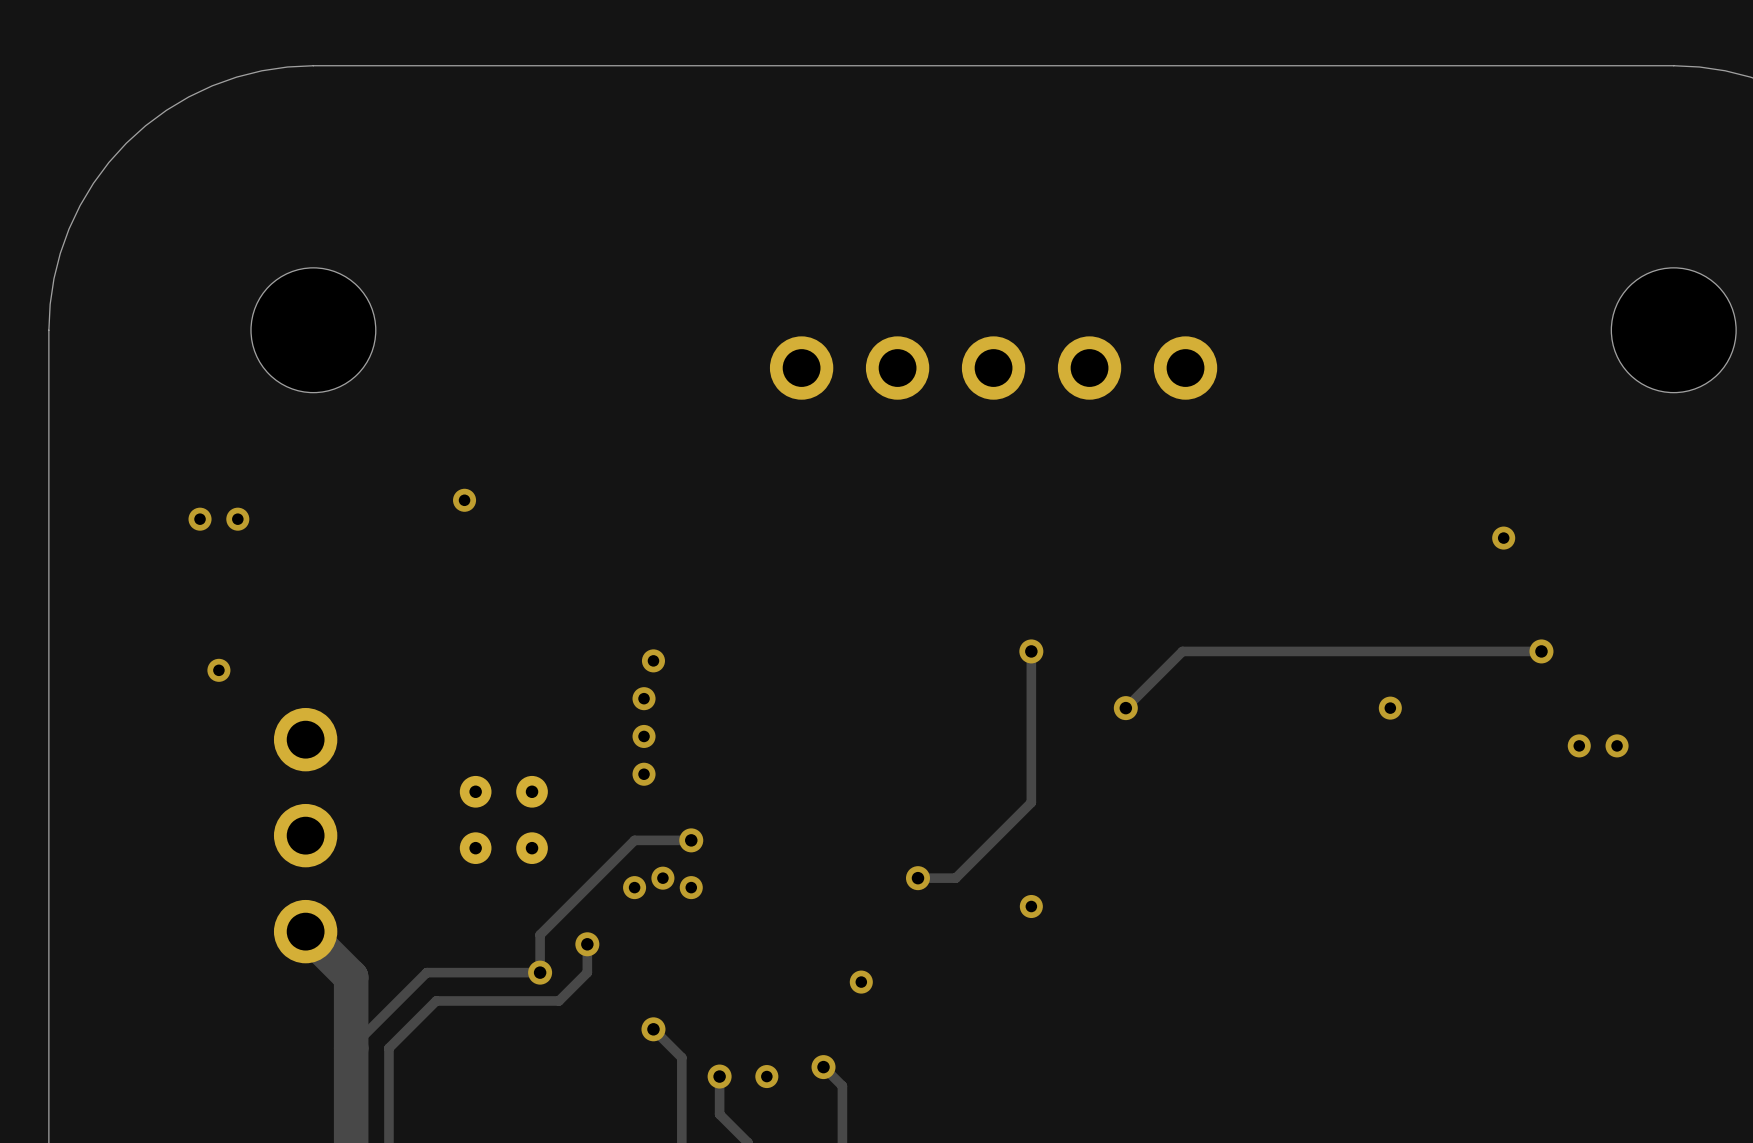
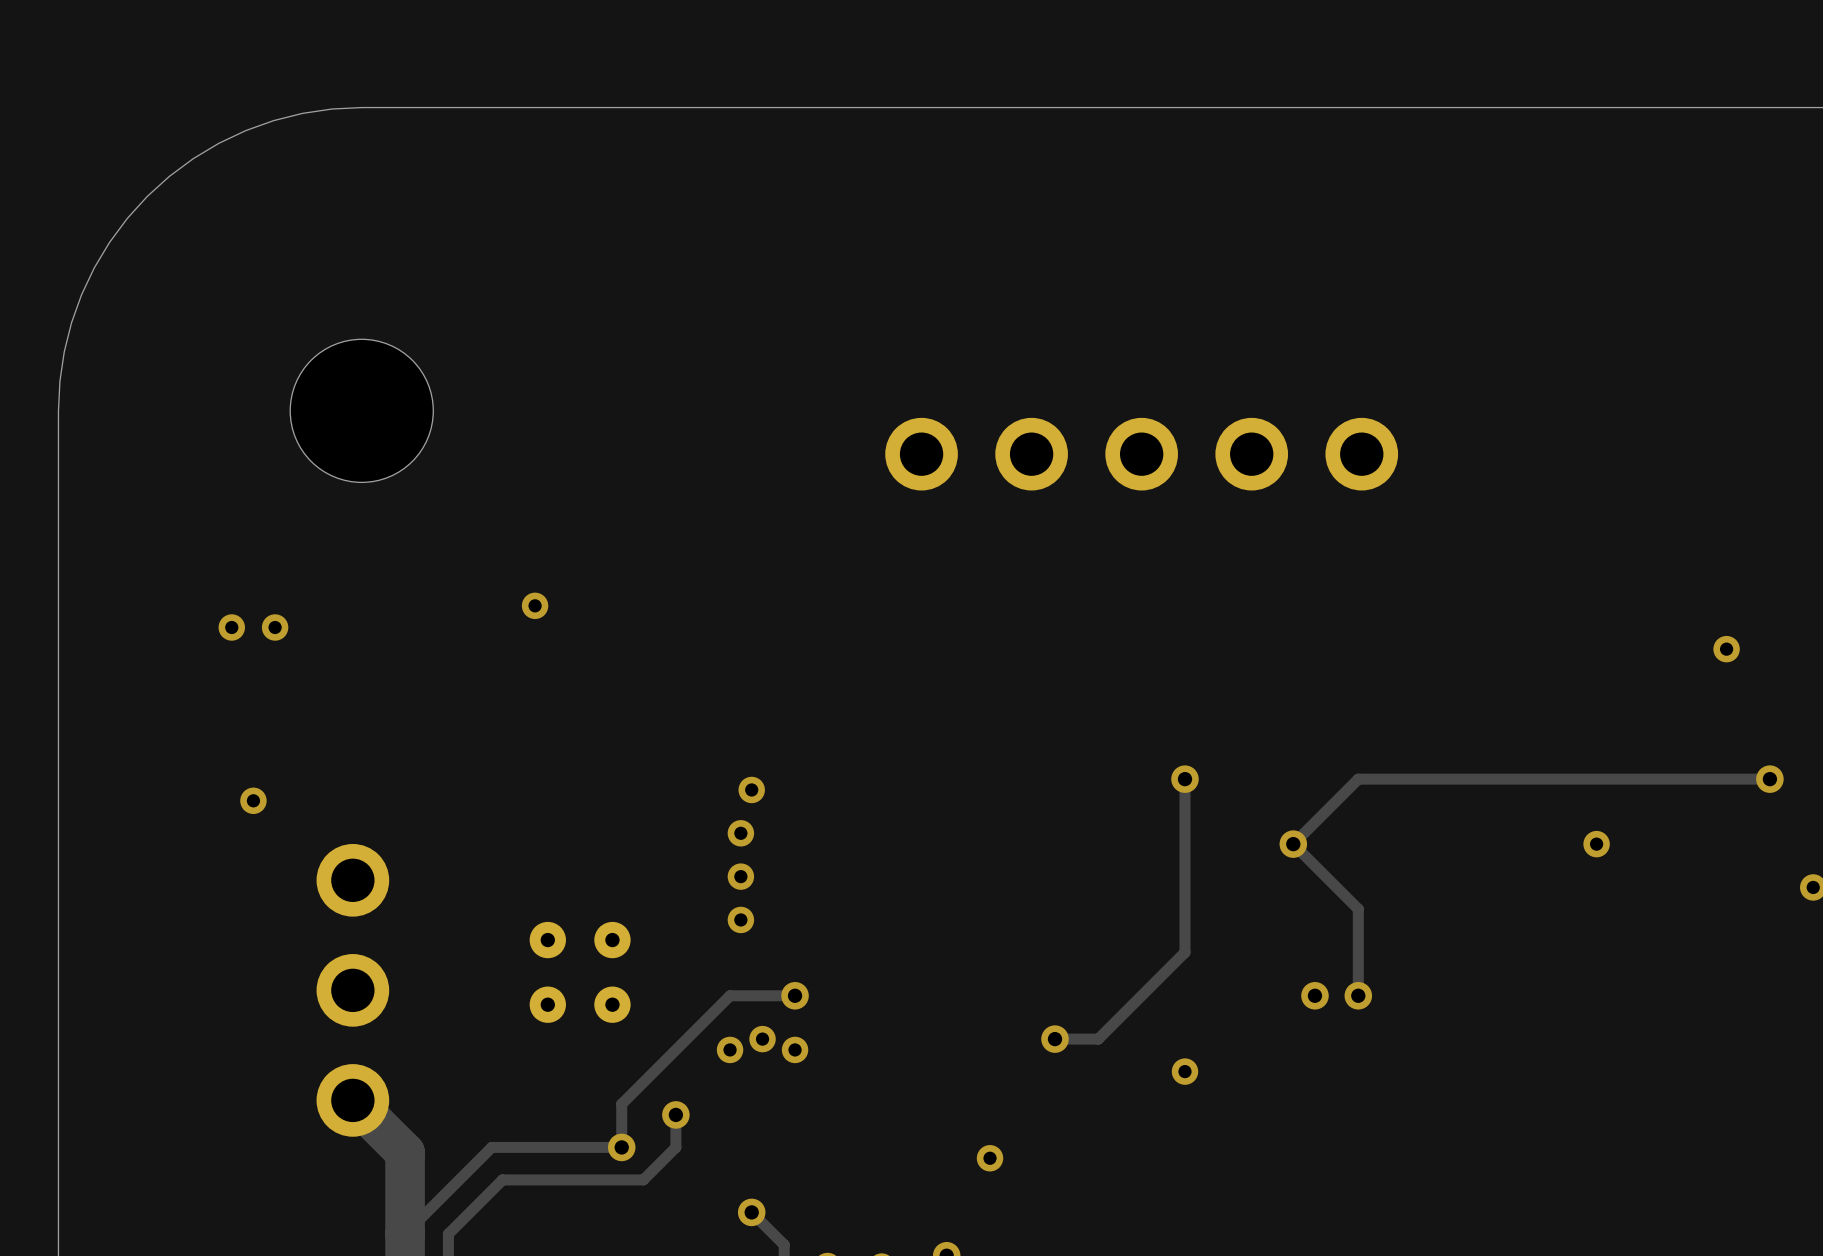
track: none -> (1293, 844) (1358, 909) (1358, 995)
via: none -> (1314, 995)
via: none -> (1358, 995)

